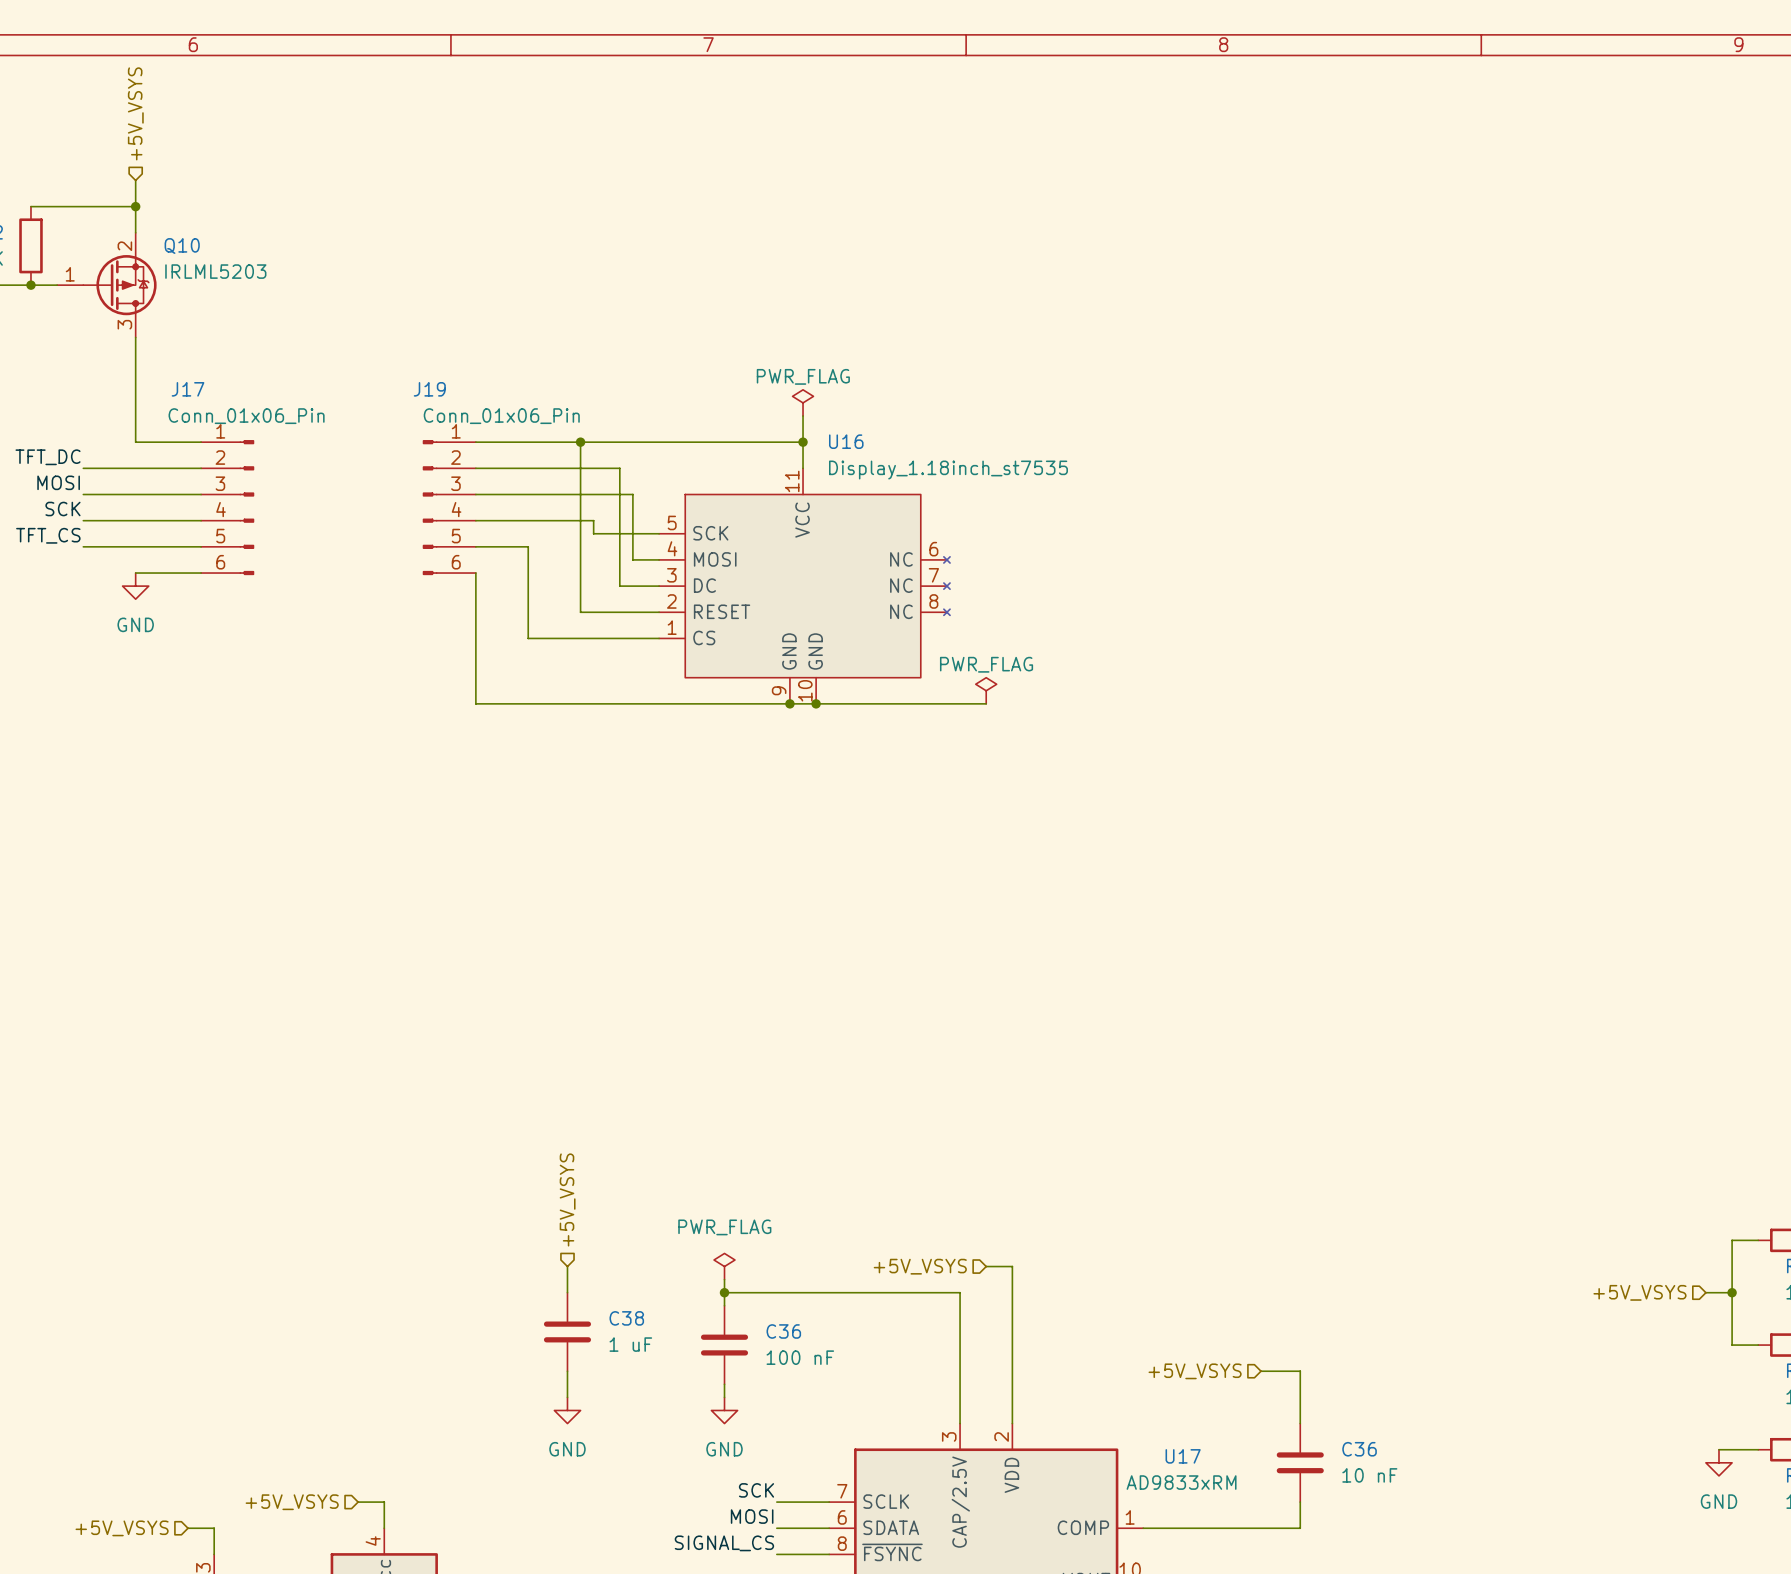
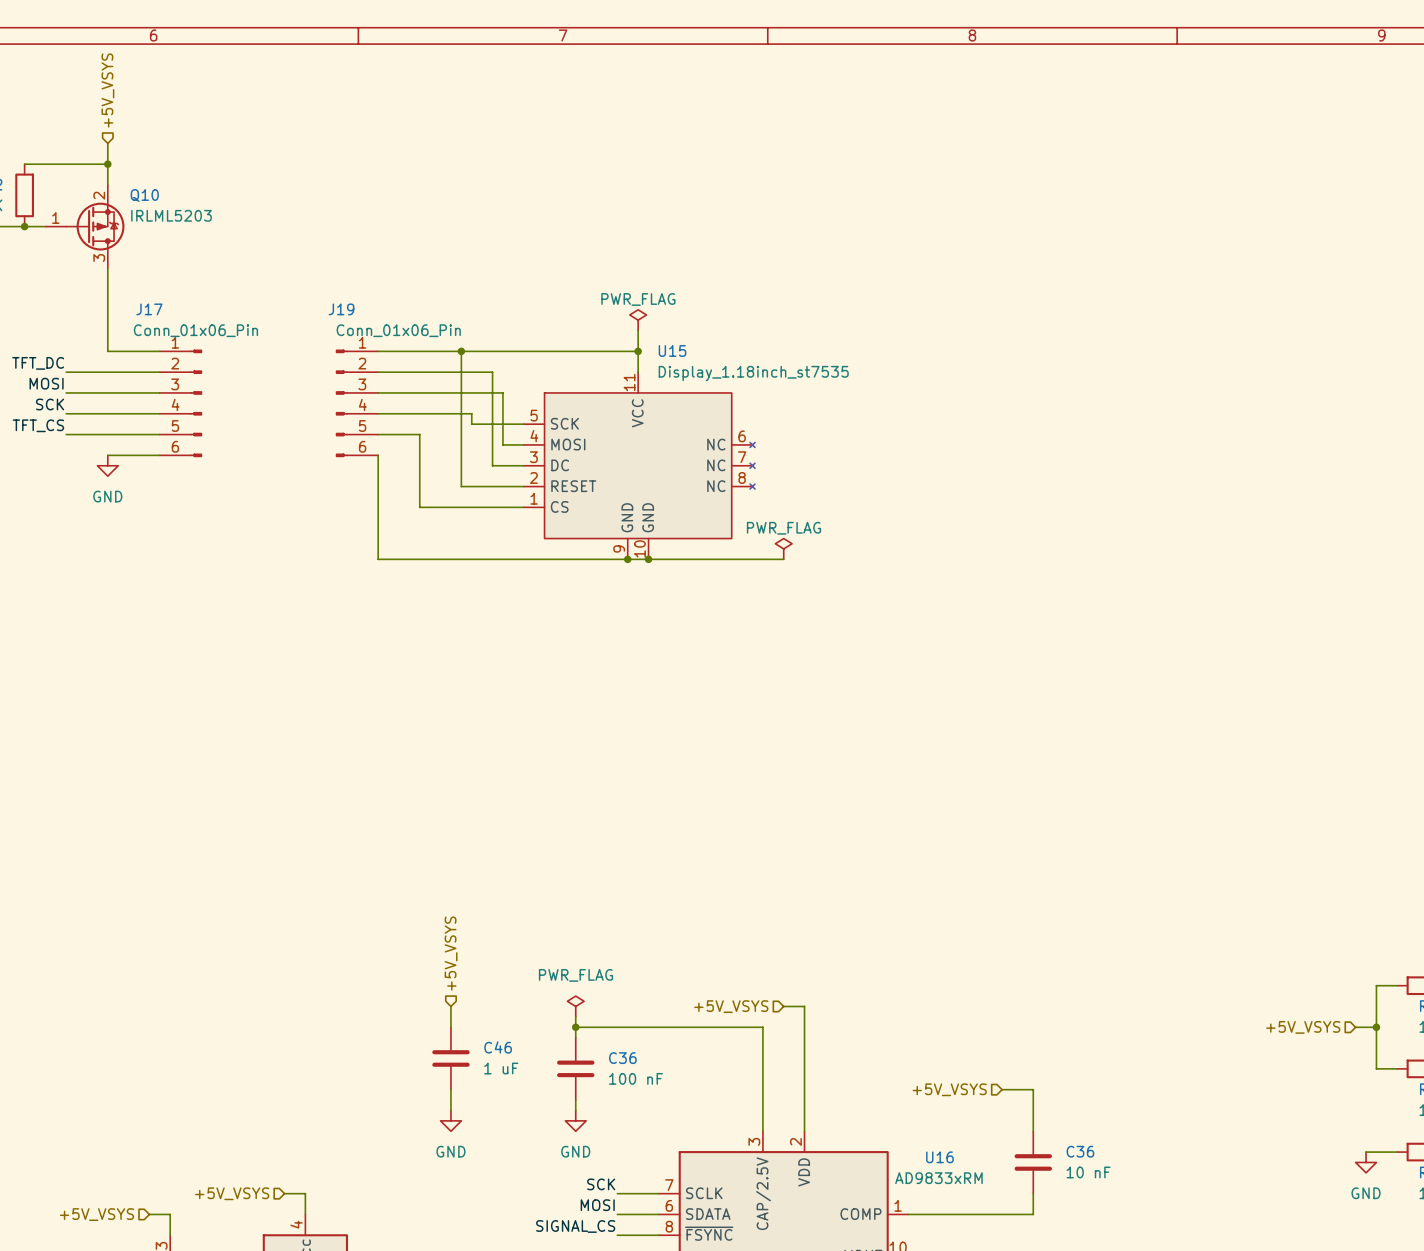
U16 name: U16 (846, 441) -> U15 (672, 350)
C38 name: C38 (626, 1318) -> C46 (498, 1047)
U17 name: U17 (1183, 1456) -> U16 (939, 1157)

